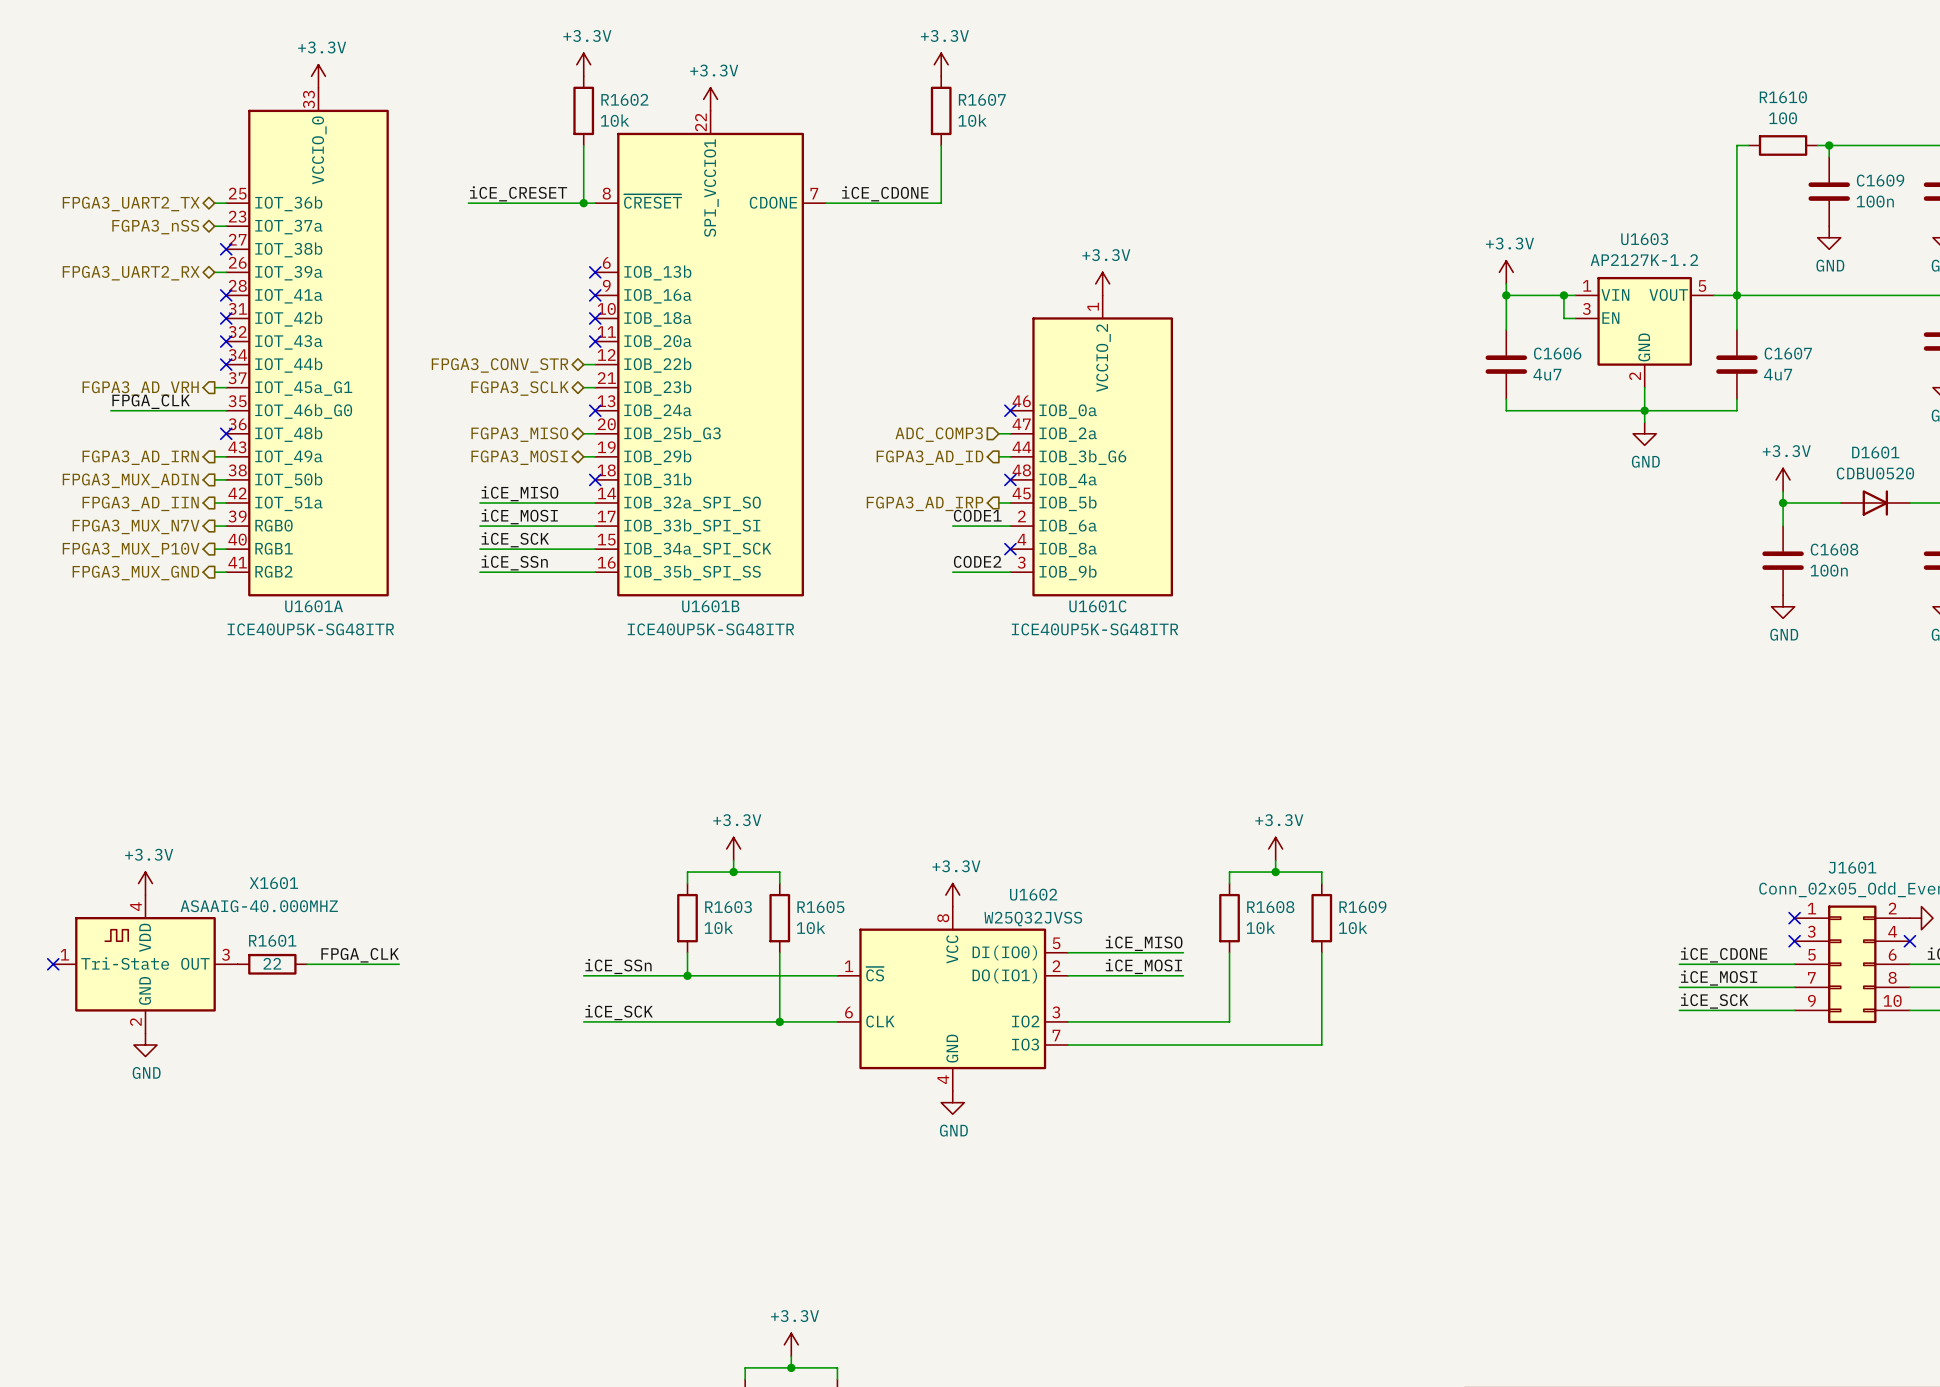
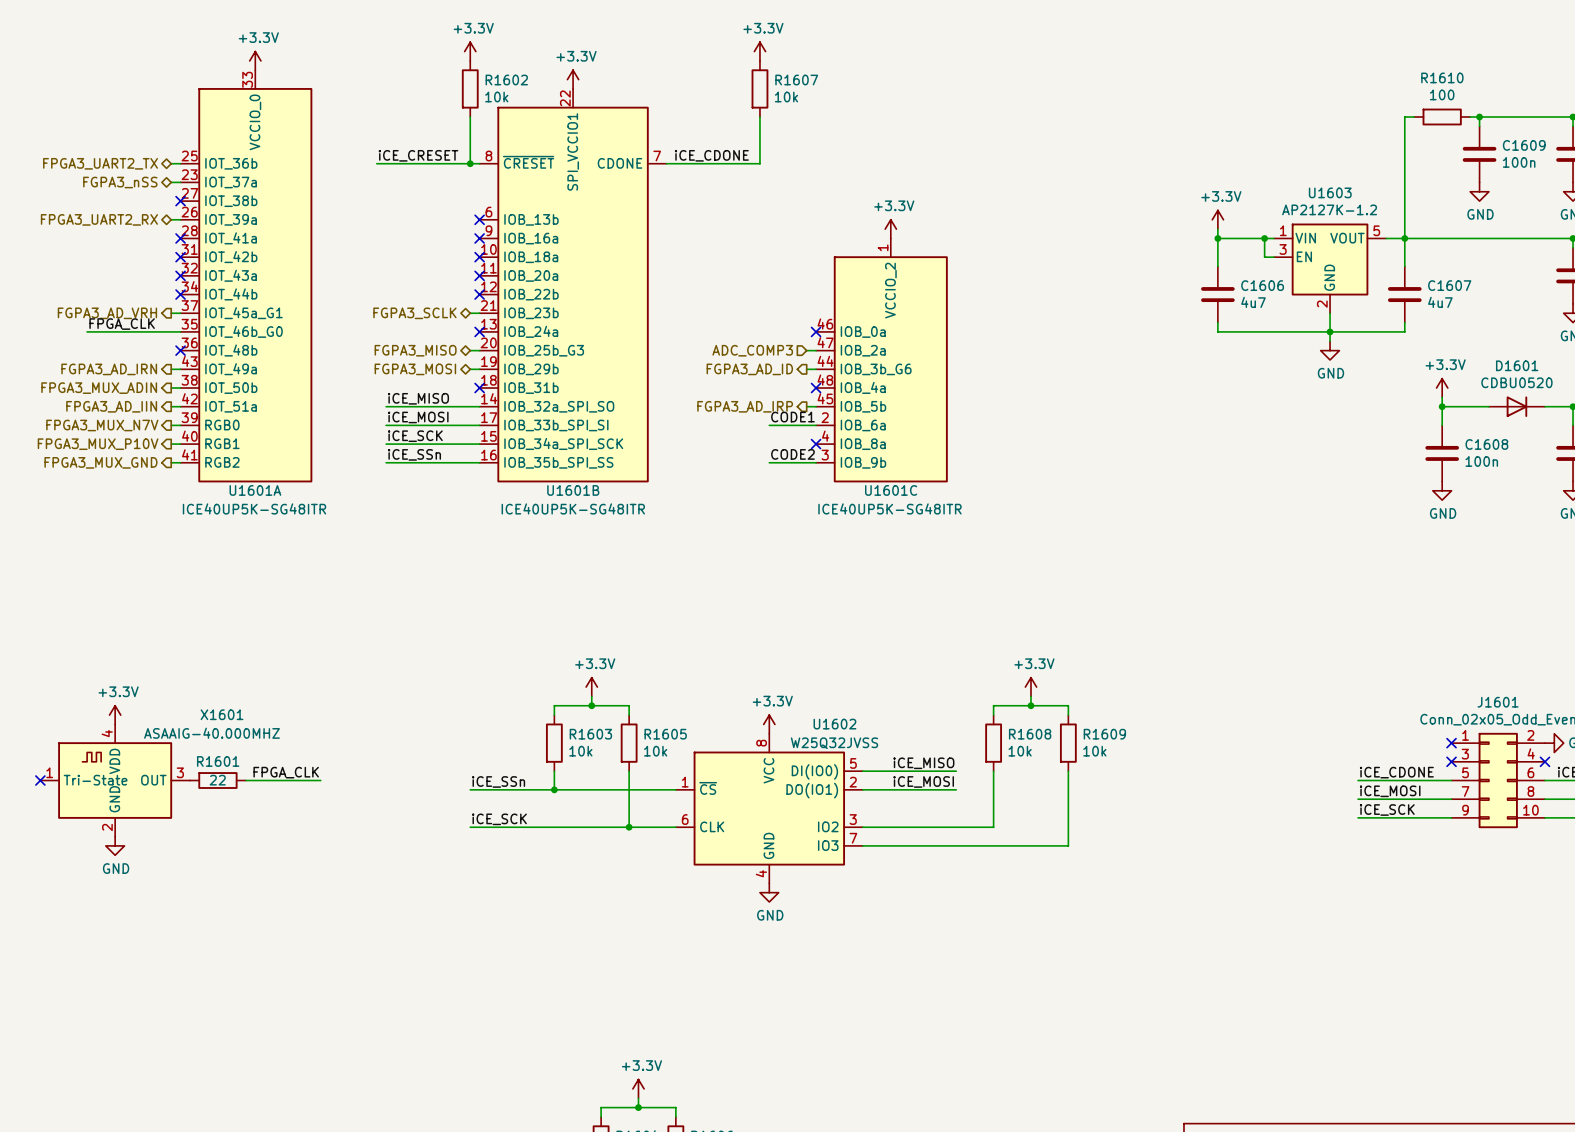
wire: (583, 364) (595, 364) -> none
no-connect mark: none -> (479, 294)
hierarchical label: FPGA3_CONV_STR (500, 365) -> none

